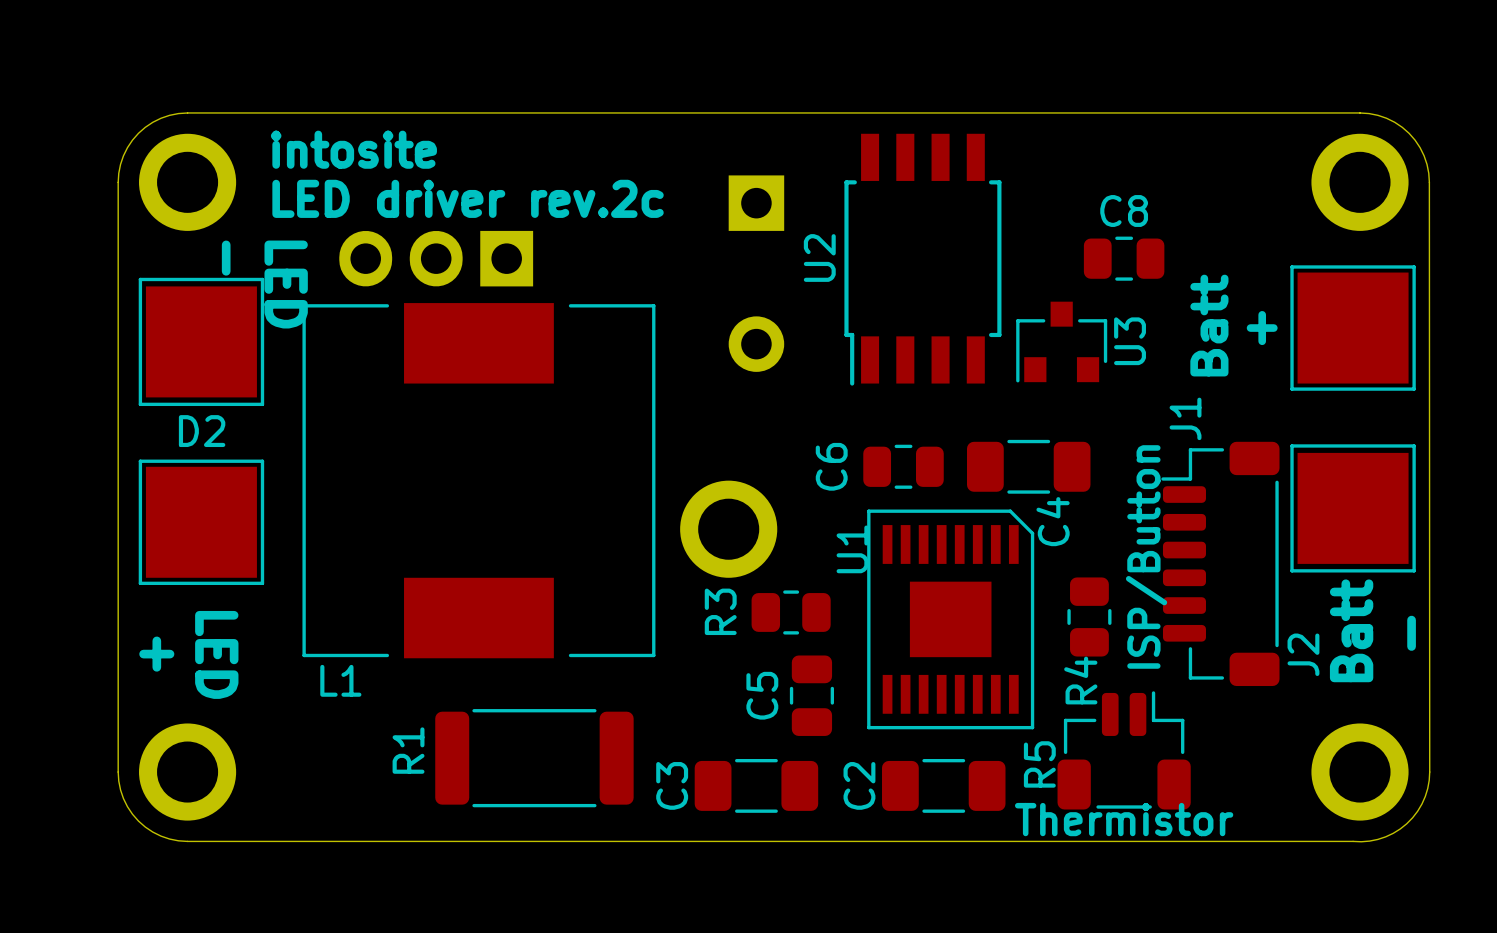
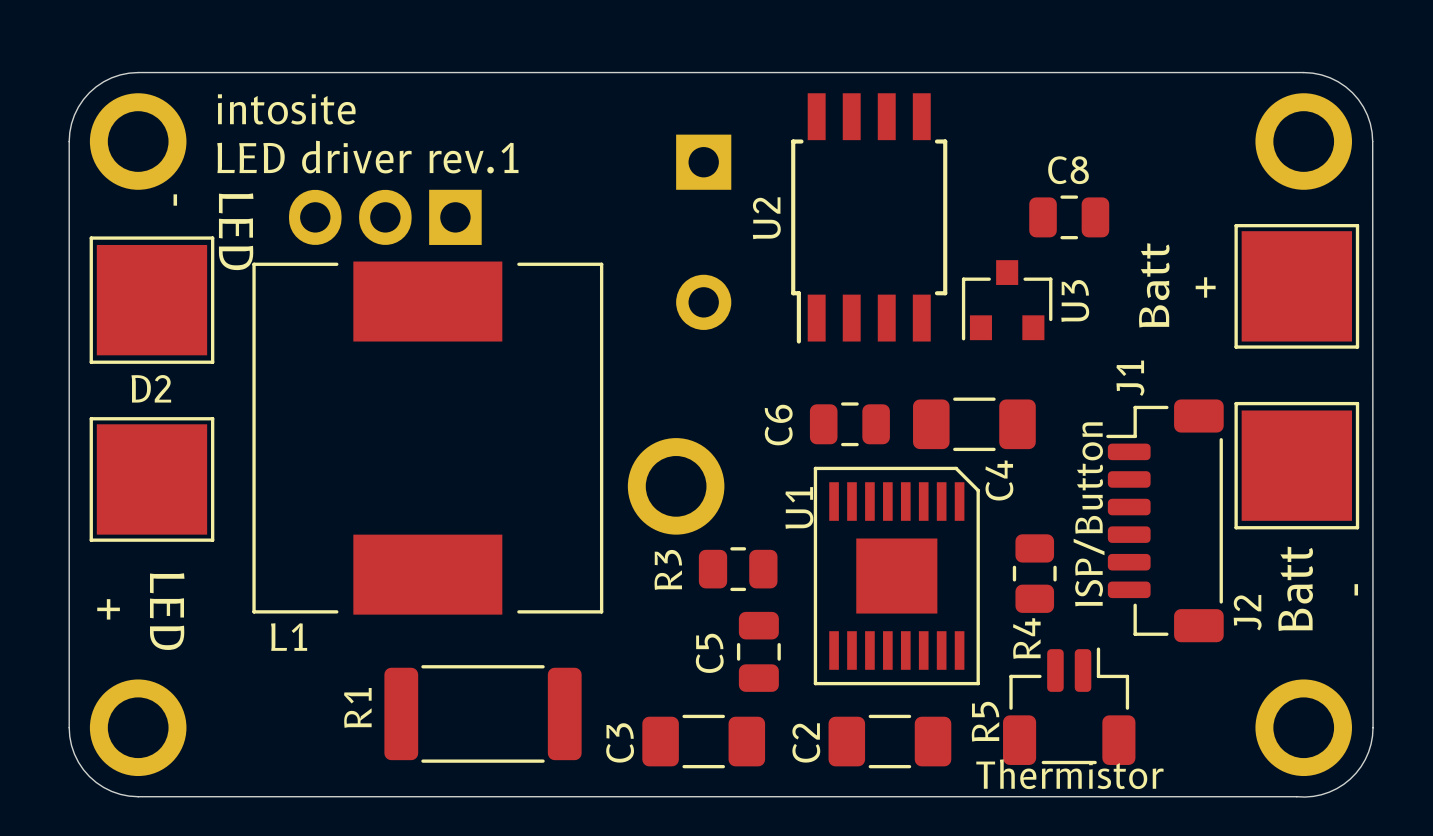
text: LED driver rev.2c (468, 198) -> LED driver rev.1 (367, 157)

